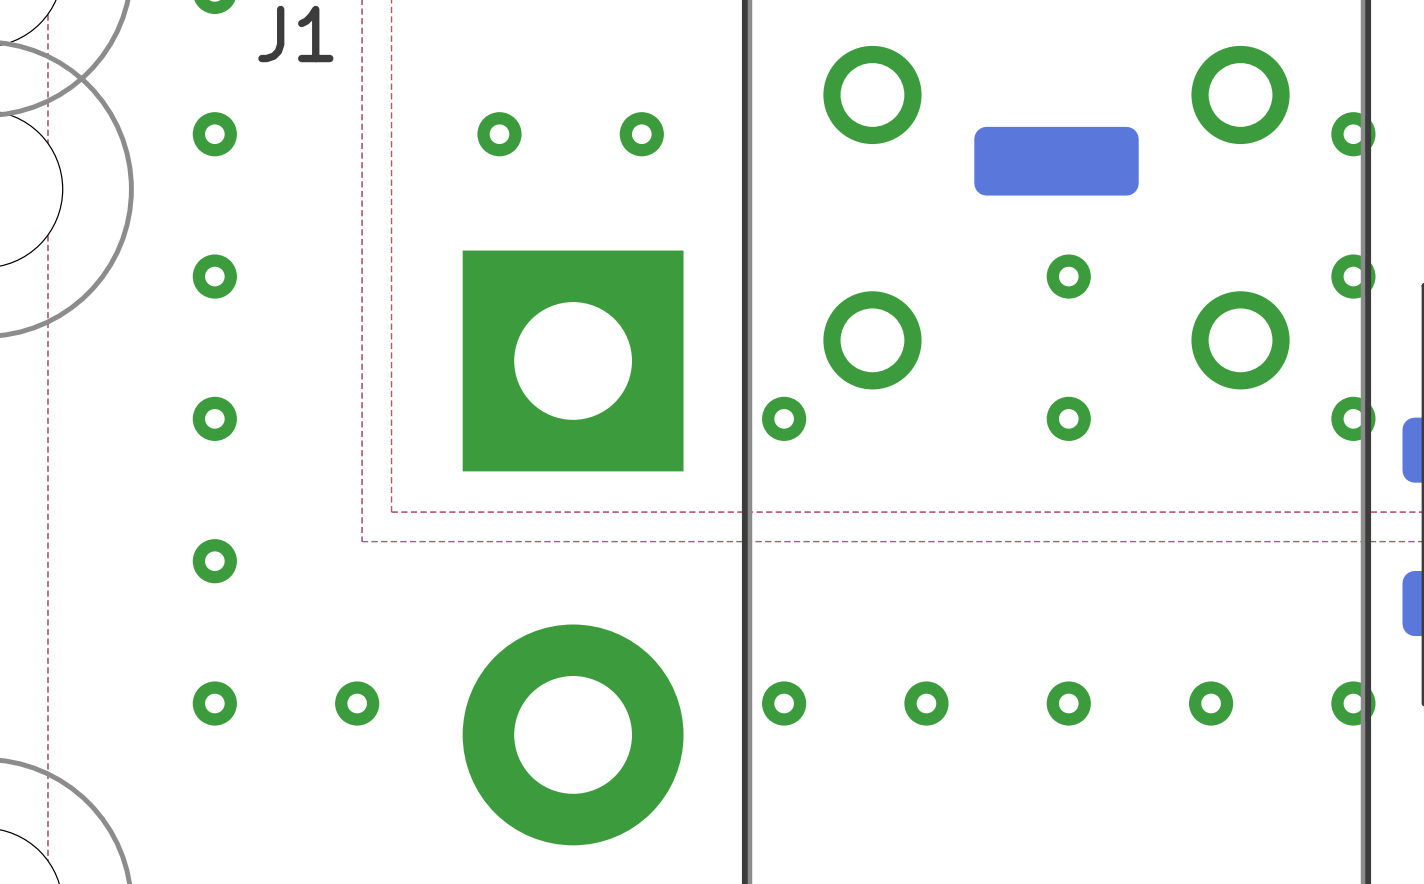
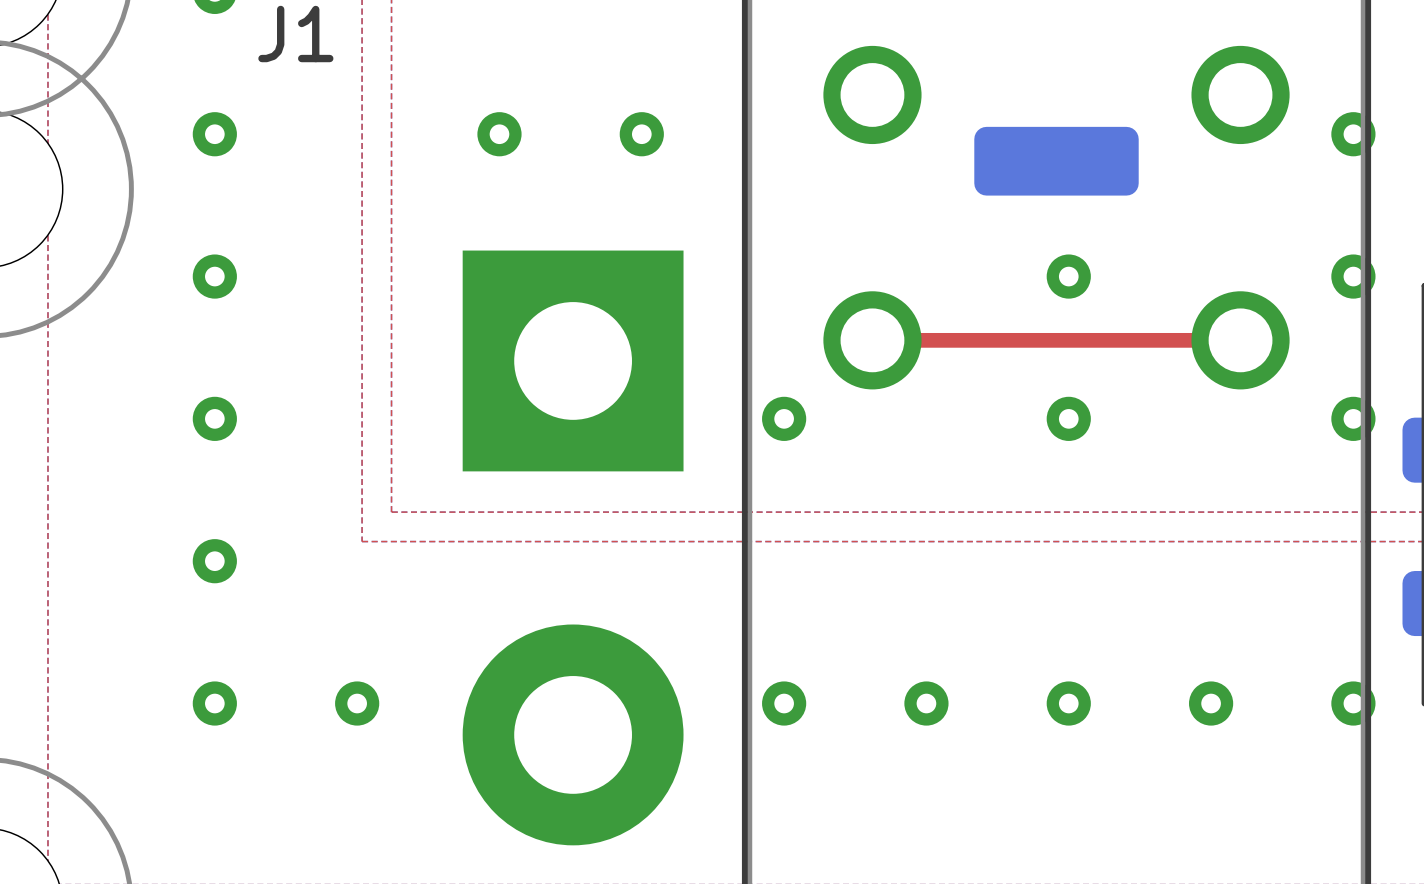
top track: none -> (872, 340) (1240, 340)

